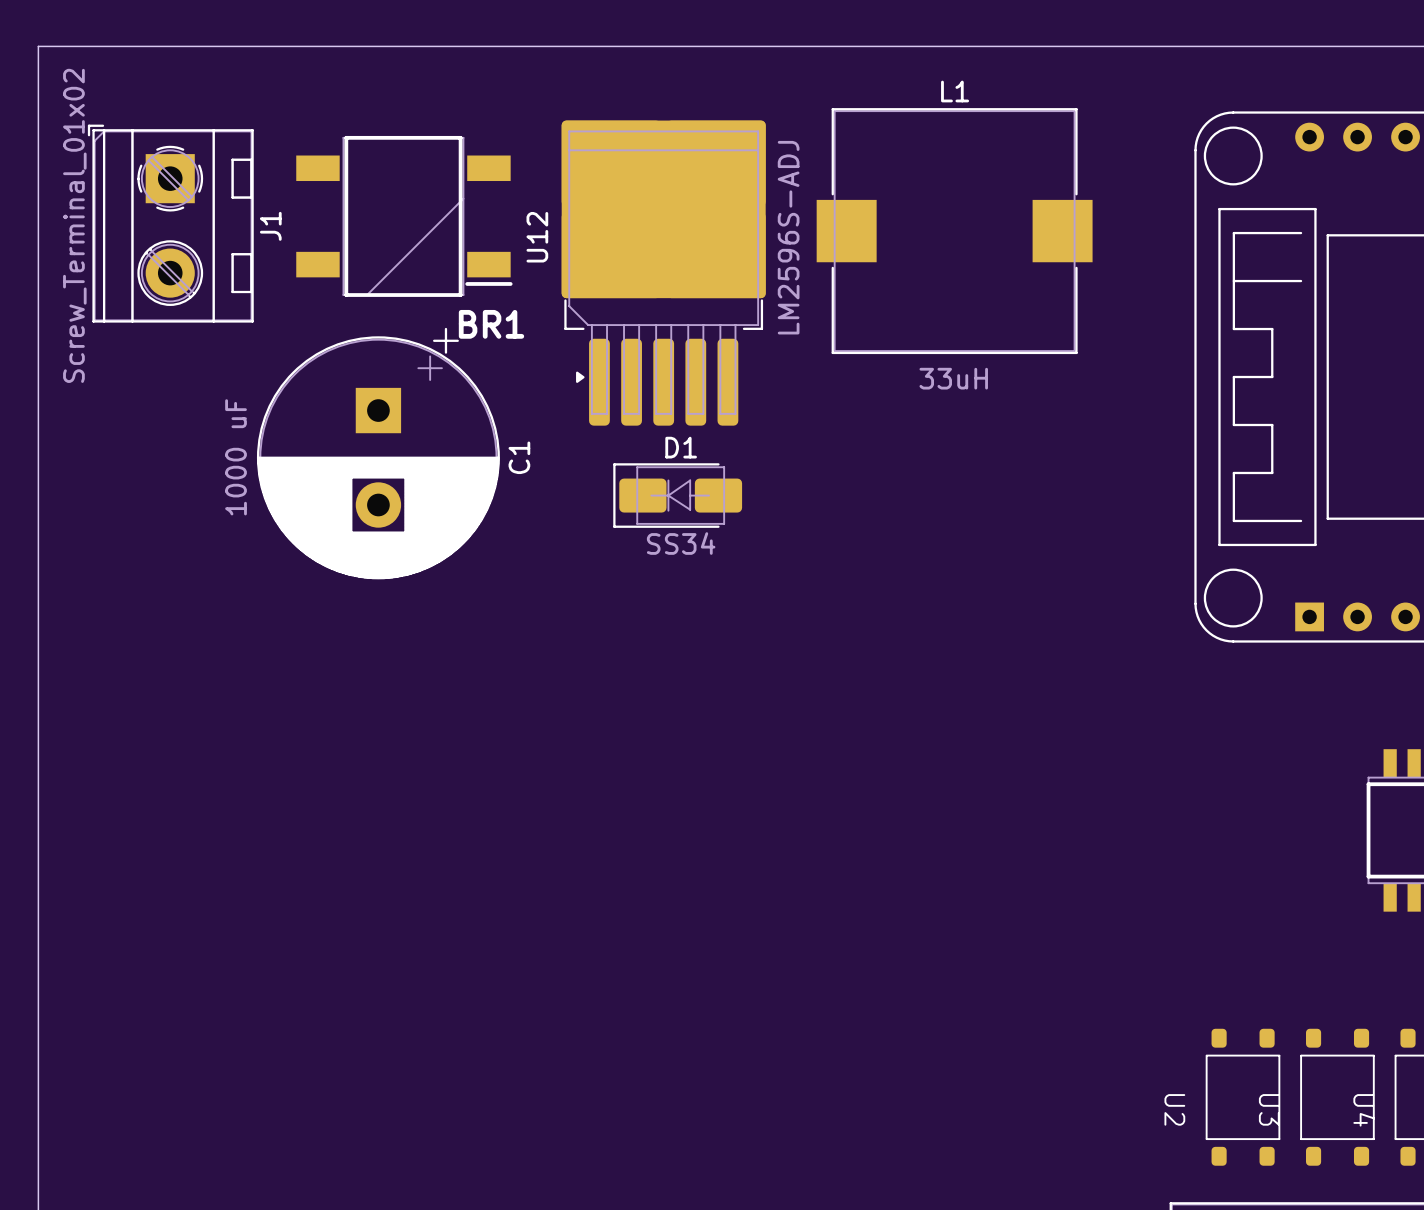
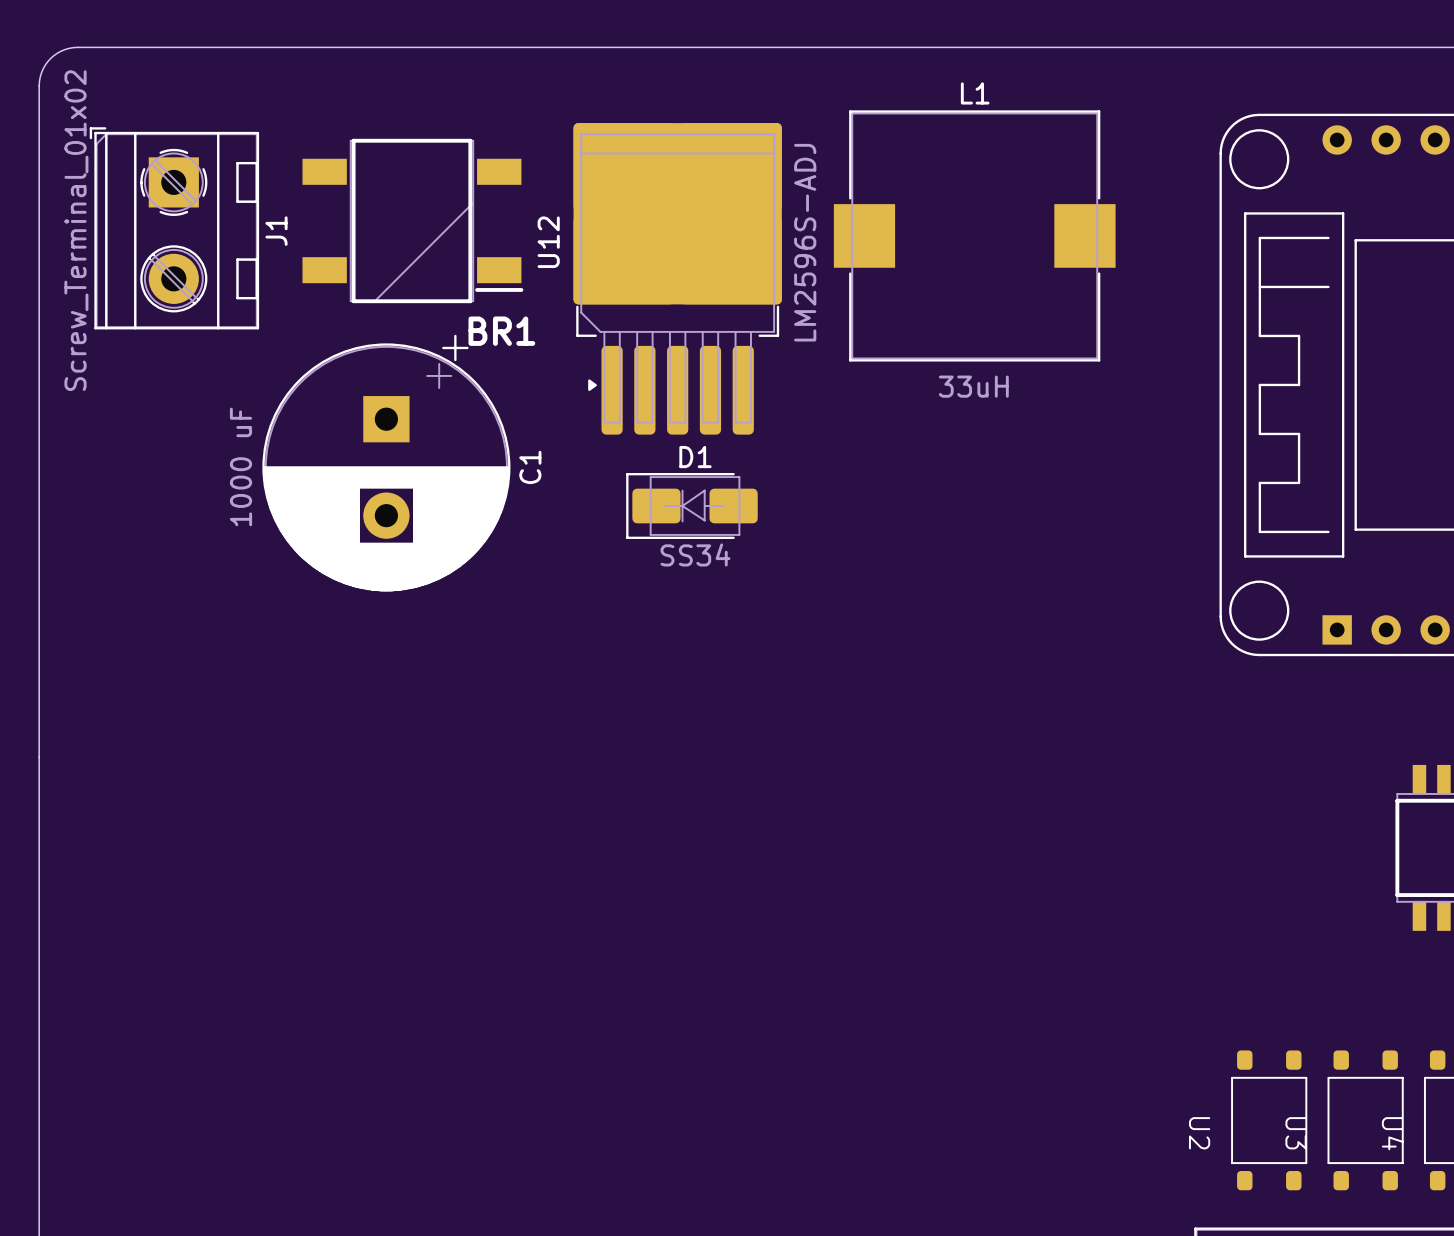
board edge: (76, 46) (38, 46) (38, 84) -> (77, 47) (61, 51) (50, 58) (41, 73) (39, 85)

